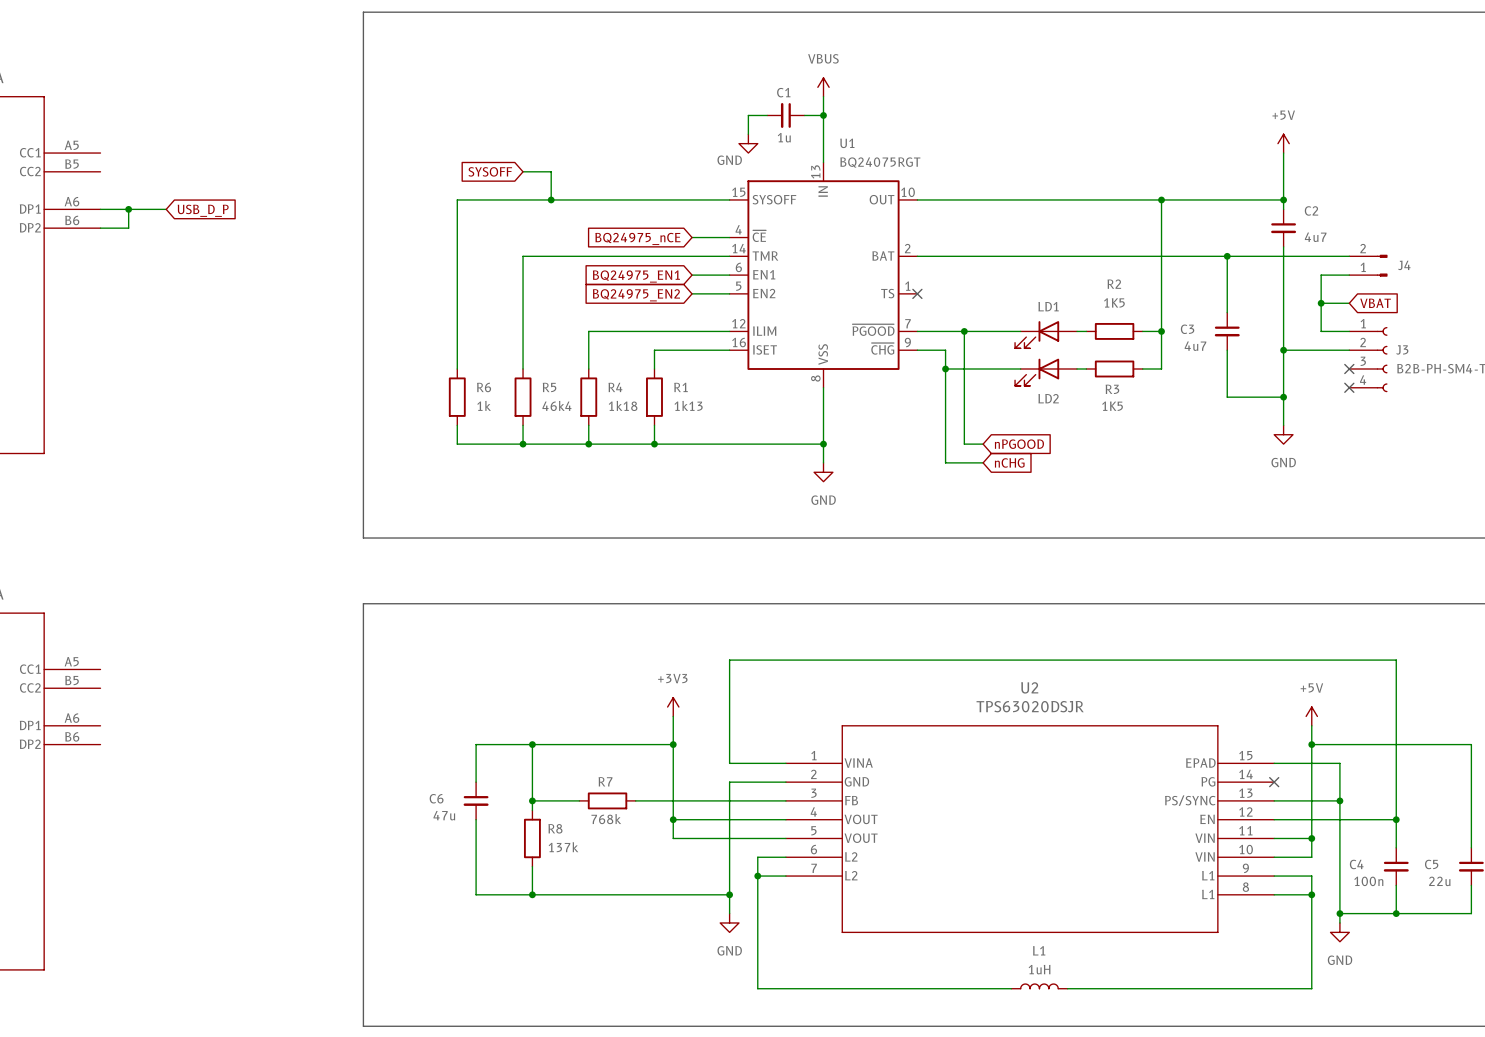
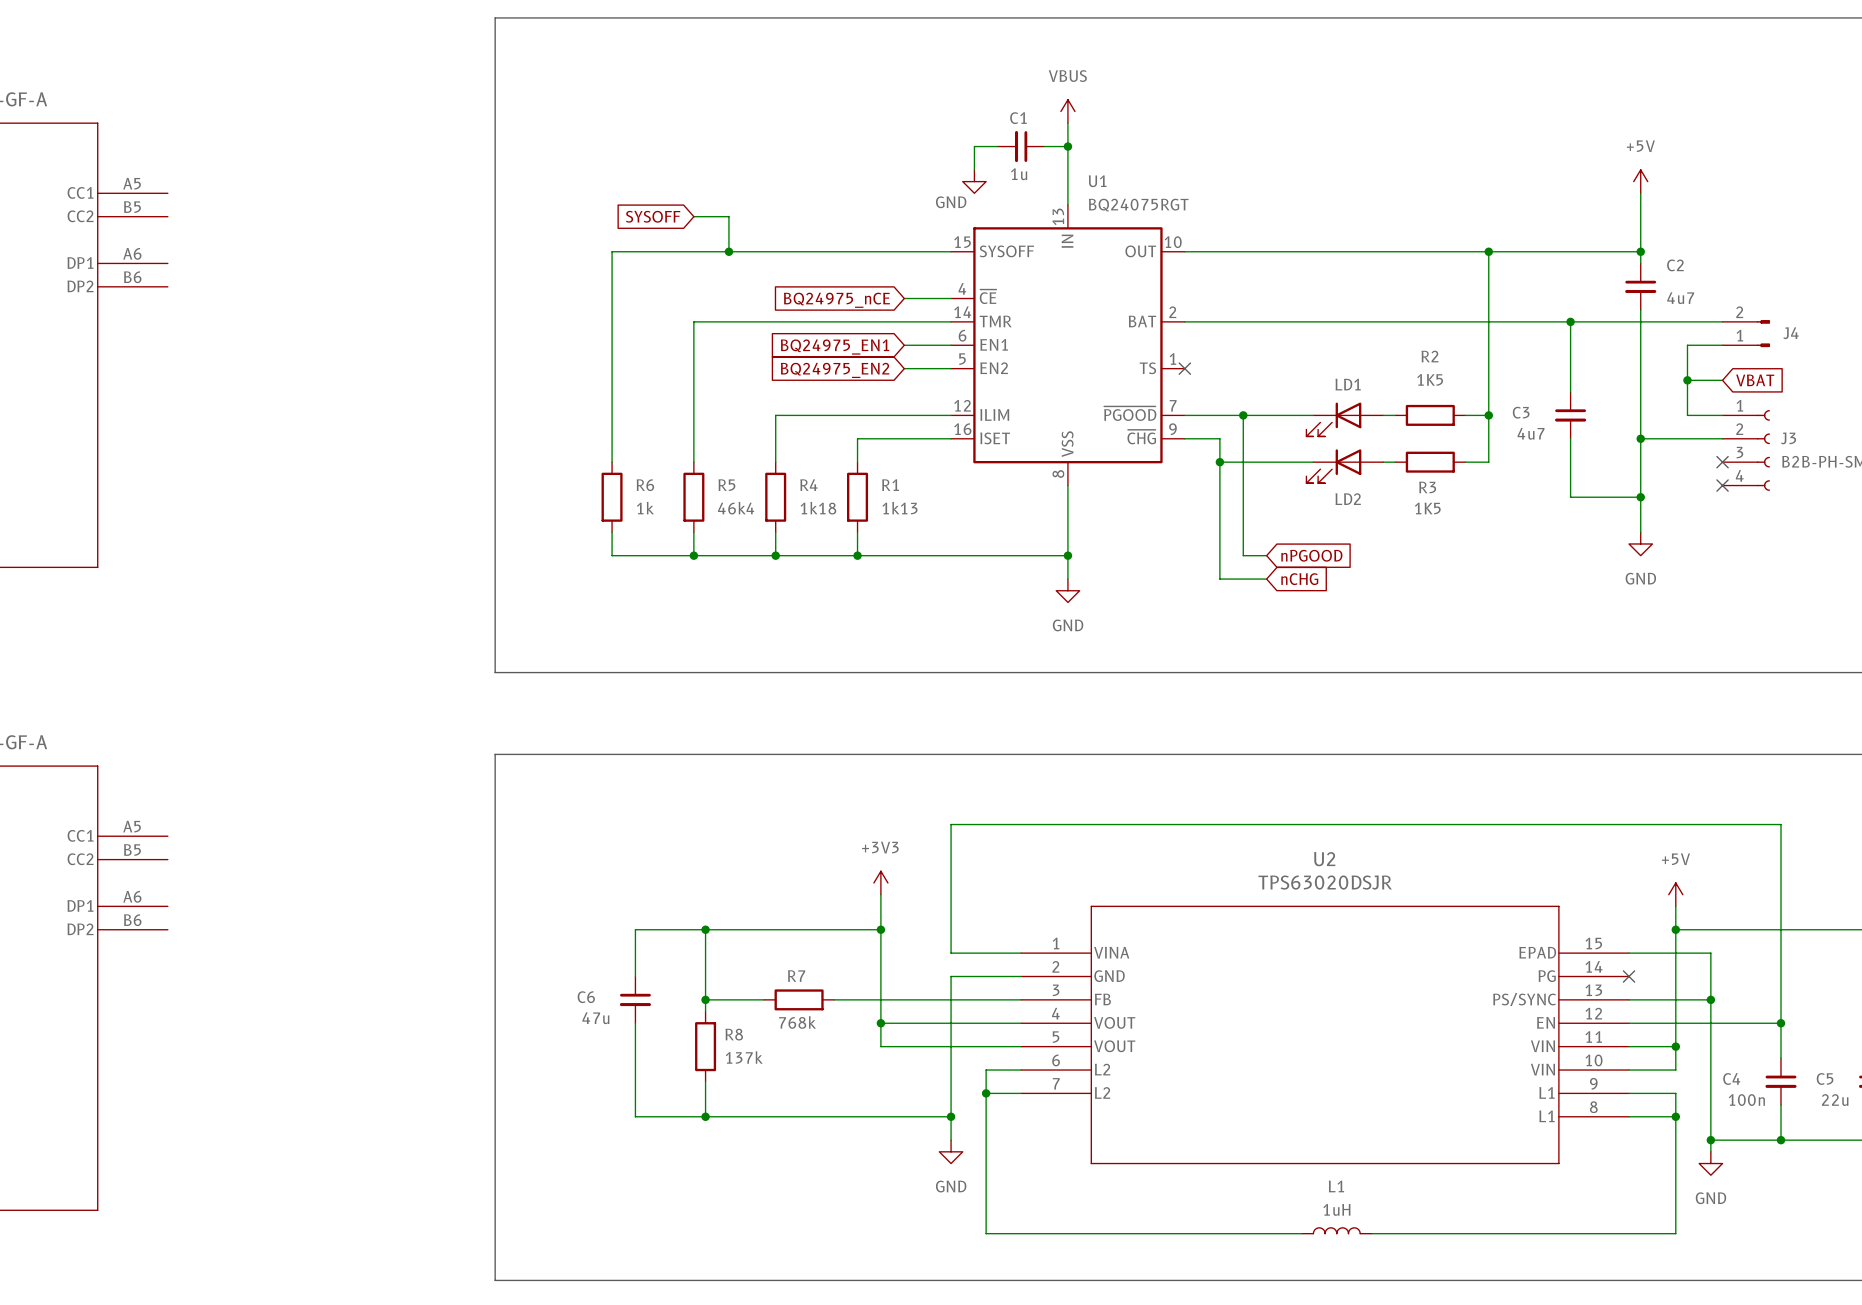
wire: (100, 209) (166, 209) -> none
wire: (128, 209) (128, 228) (100, 228) -> none
junction: (128, 209) -> none
global label: USB_D_P (203, 210) -> none

